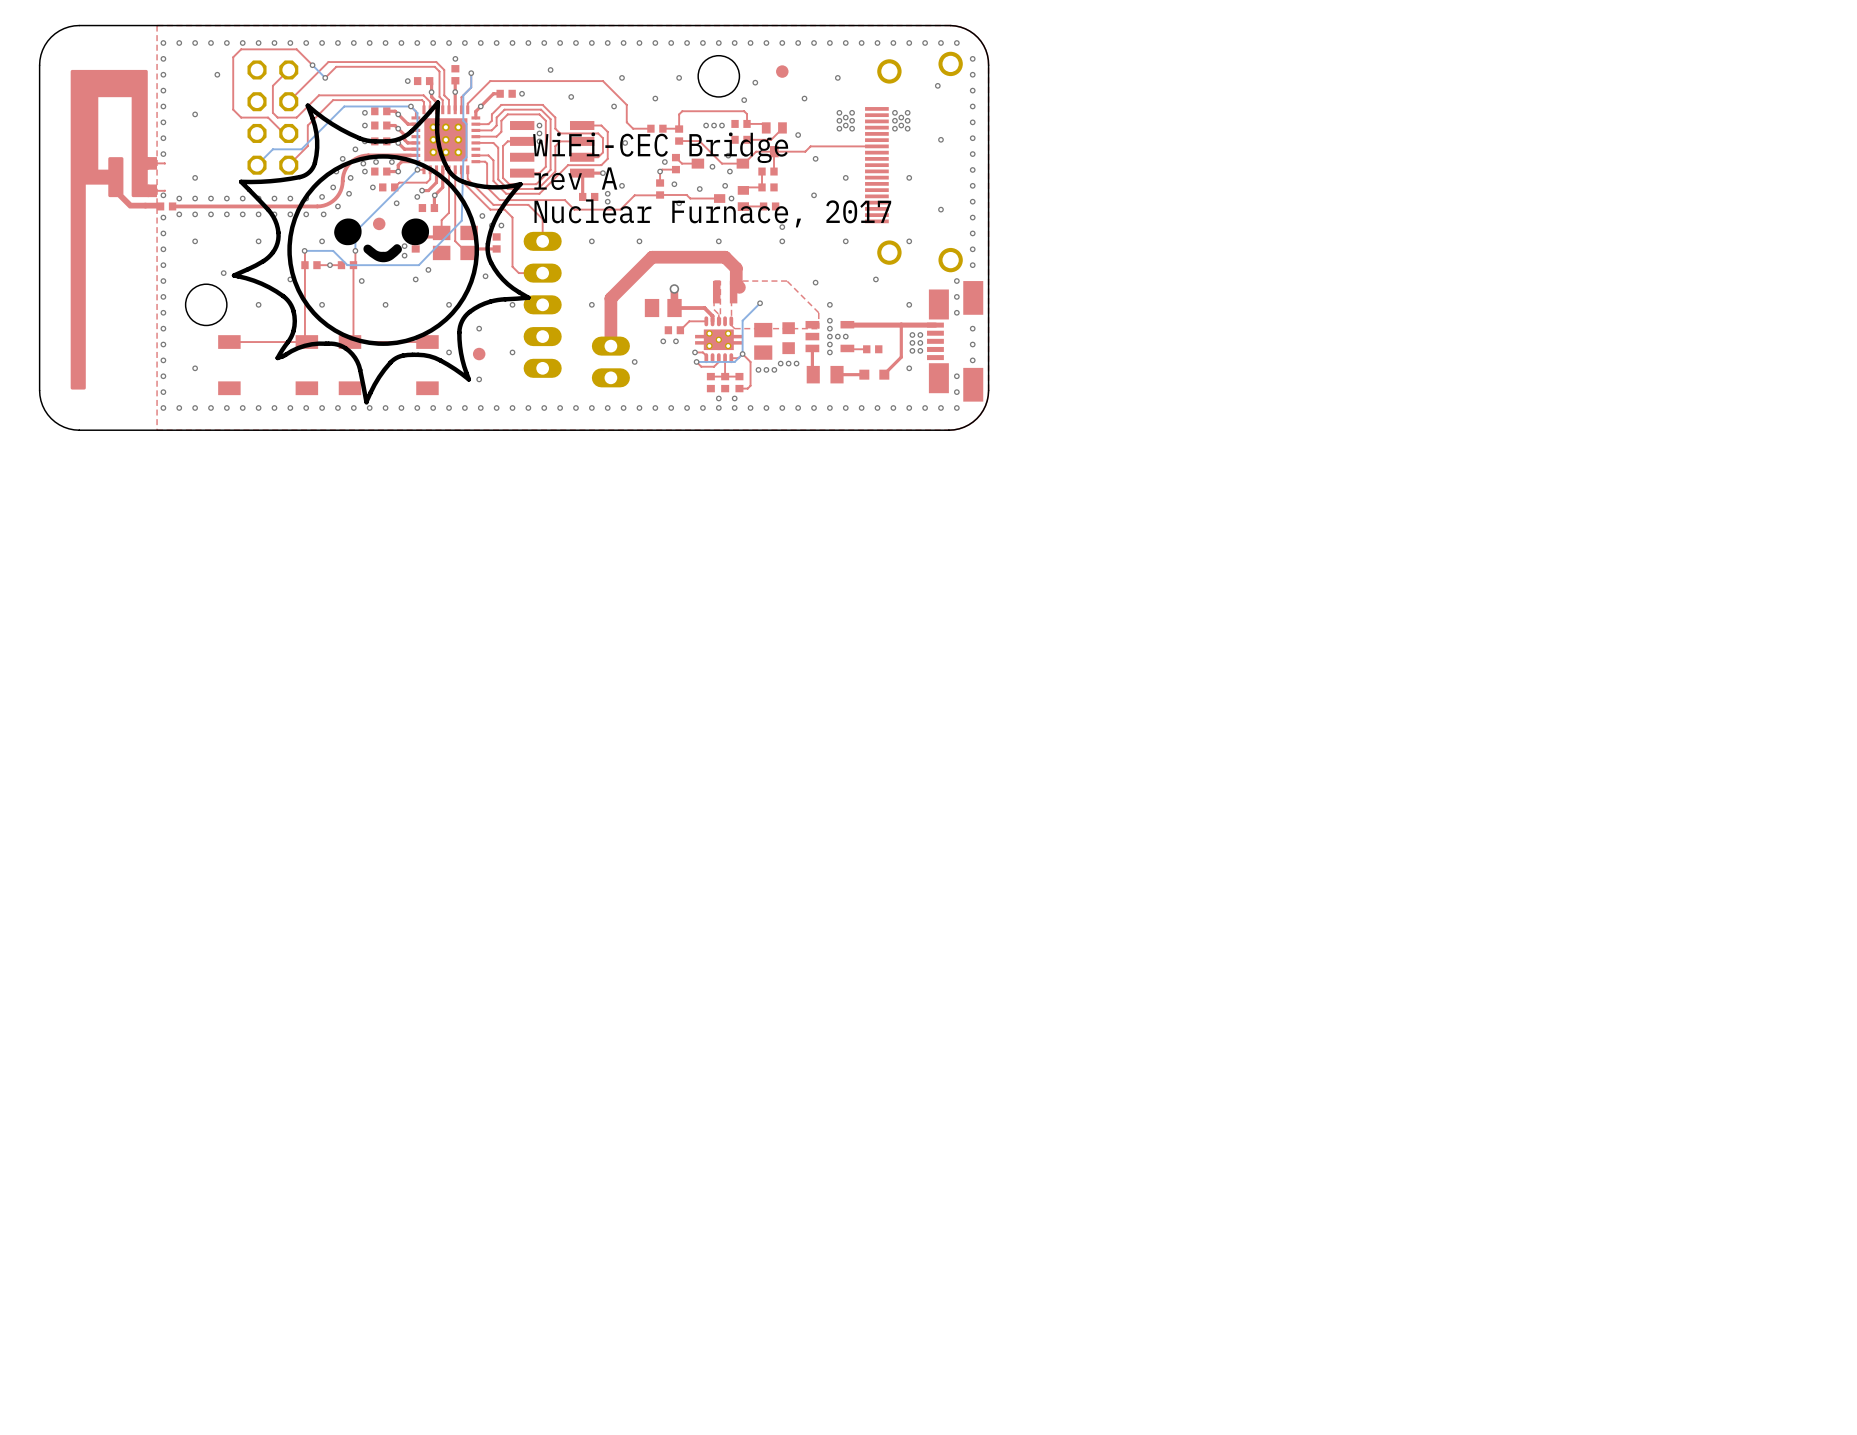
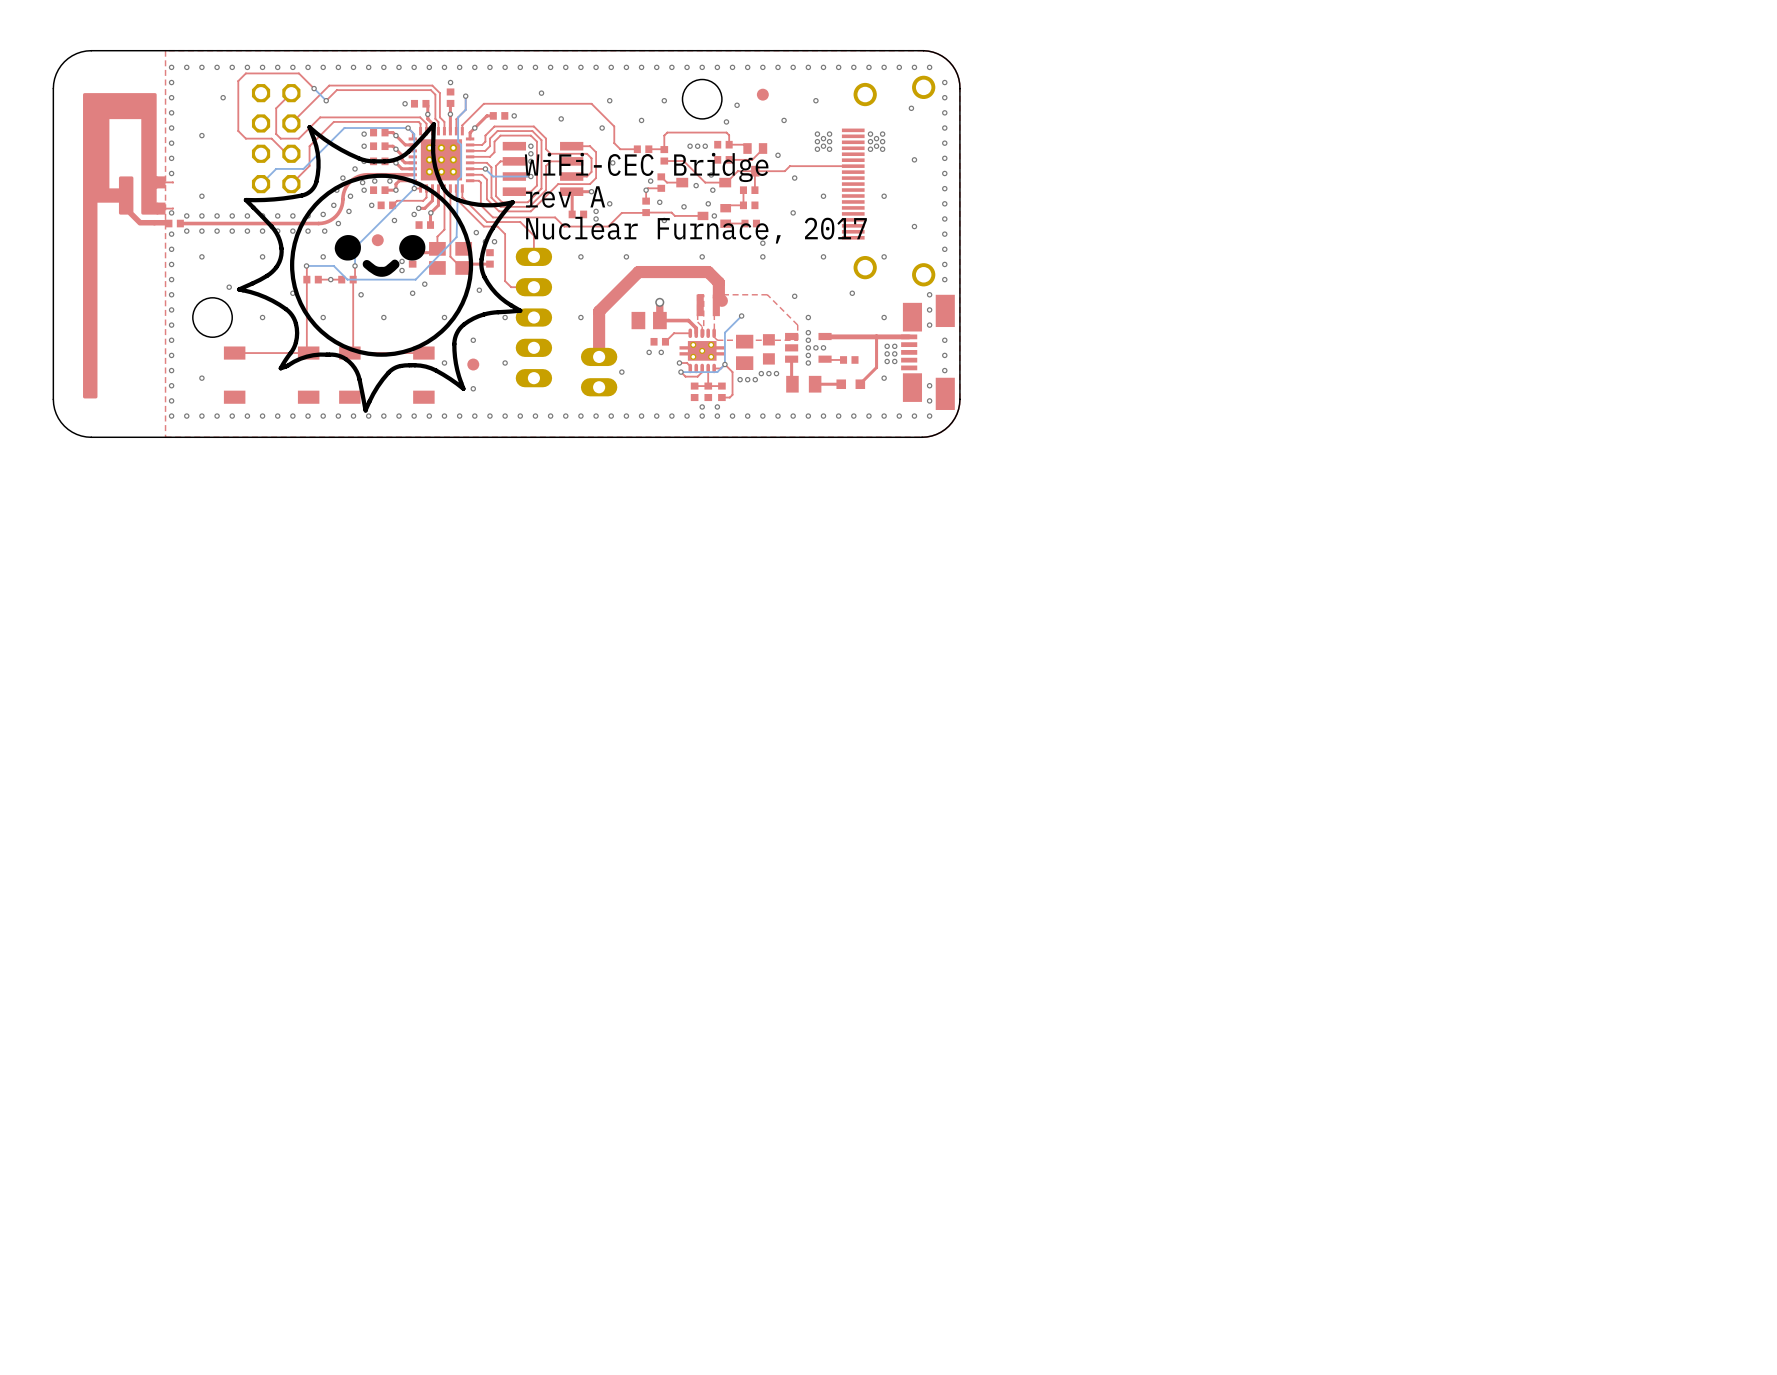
top track: none -> (485, 168) (470, 168)
bottom track: none -> (485, 168) (492, 176) (530, 176)
via: none -> (485, 168)
via: none -> (530, 176)

